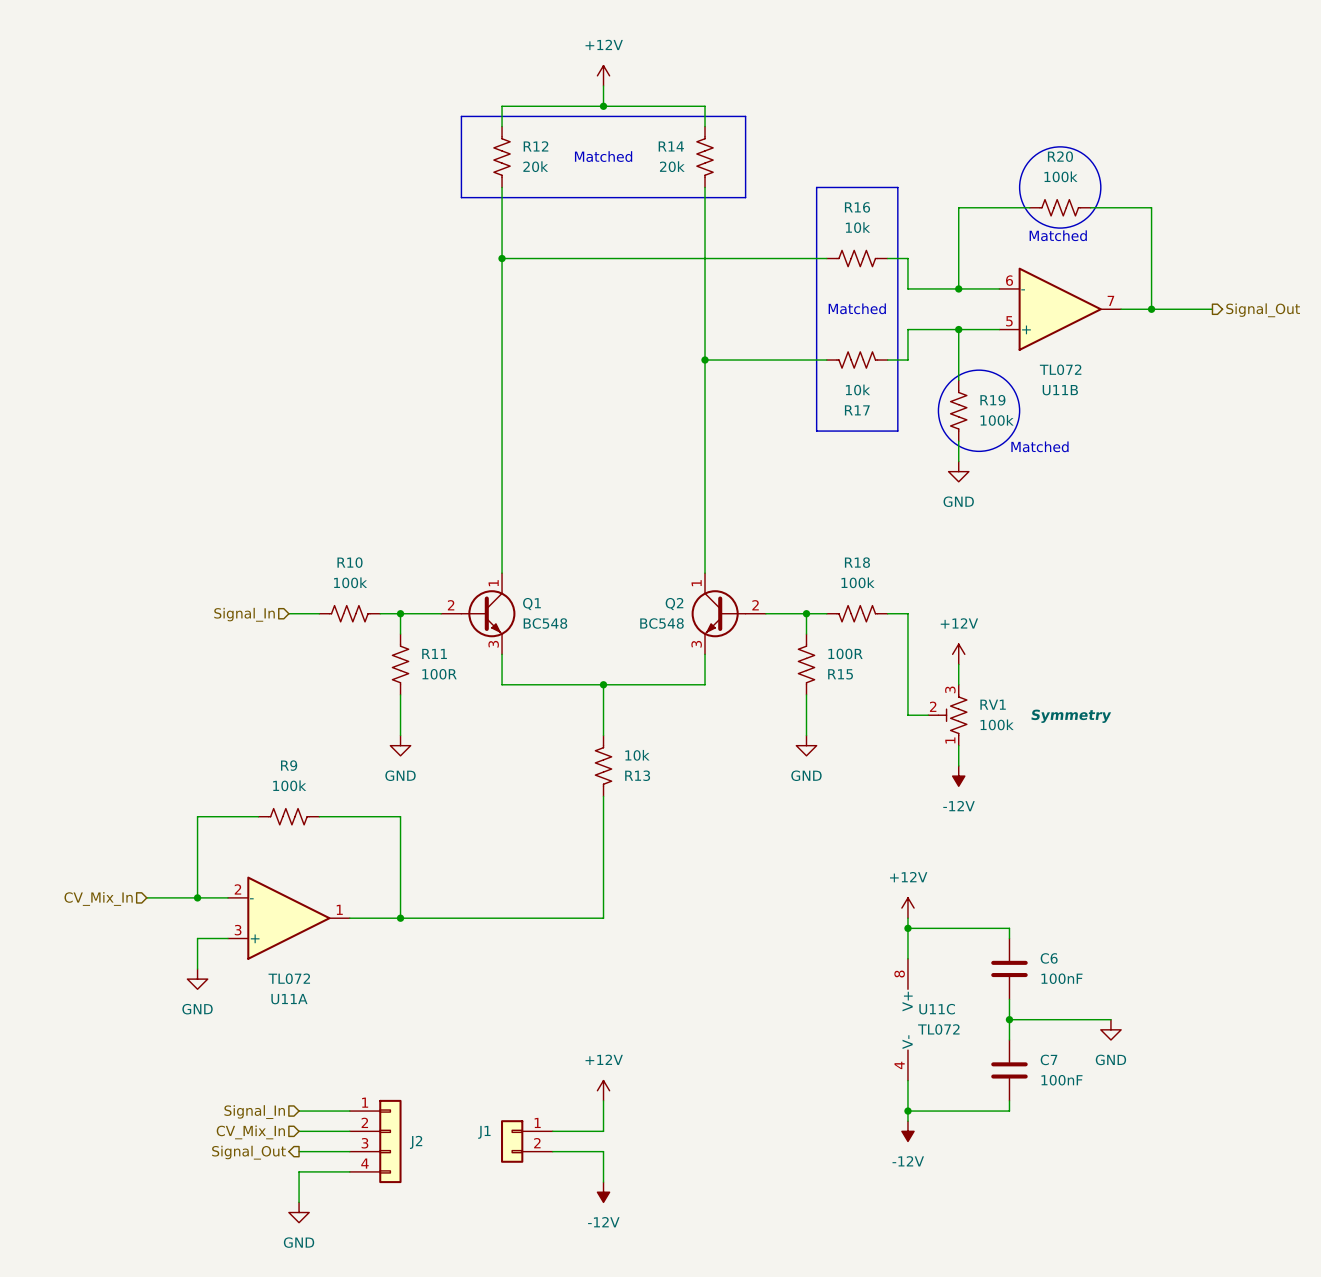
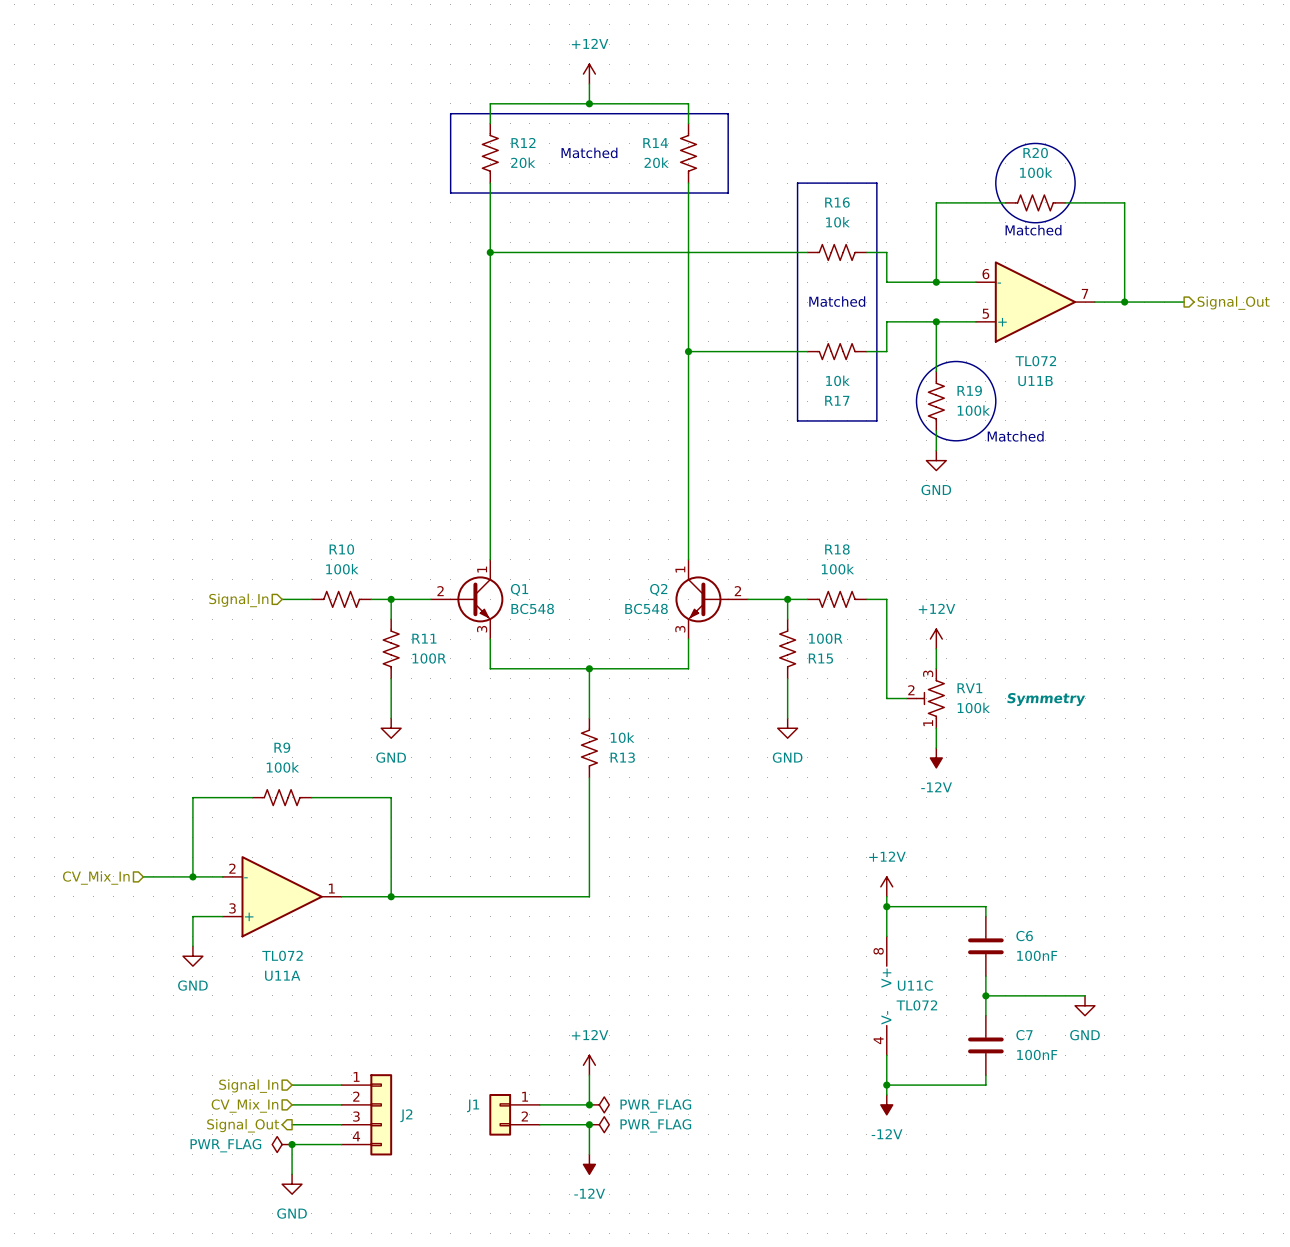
junction: none -> (589, 1104)
power symbol: none -> PWR_FLAG (599, 1104)
junction: none -> (589, 1124)
power symbol: none -> PWR_FLAG (599, 1124)
power symbol: none -> PWR_FLAG (282, 1144)
junction: none -> (292, 1144)

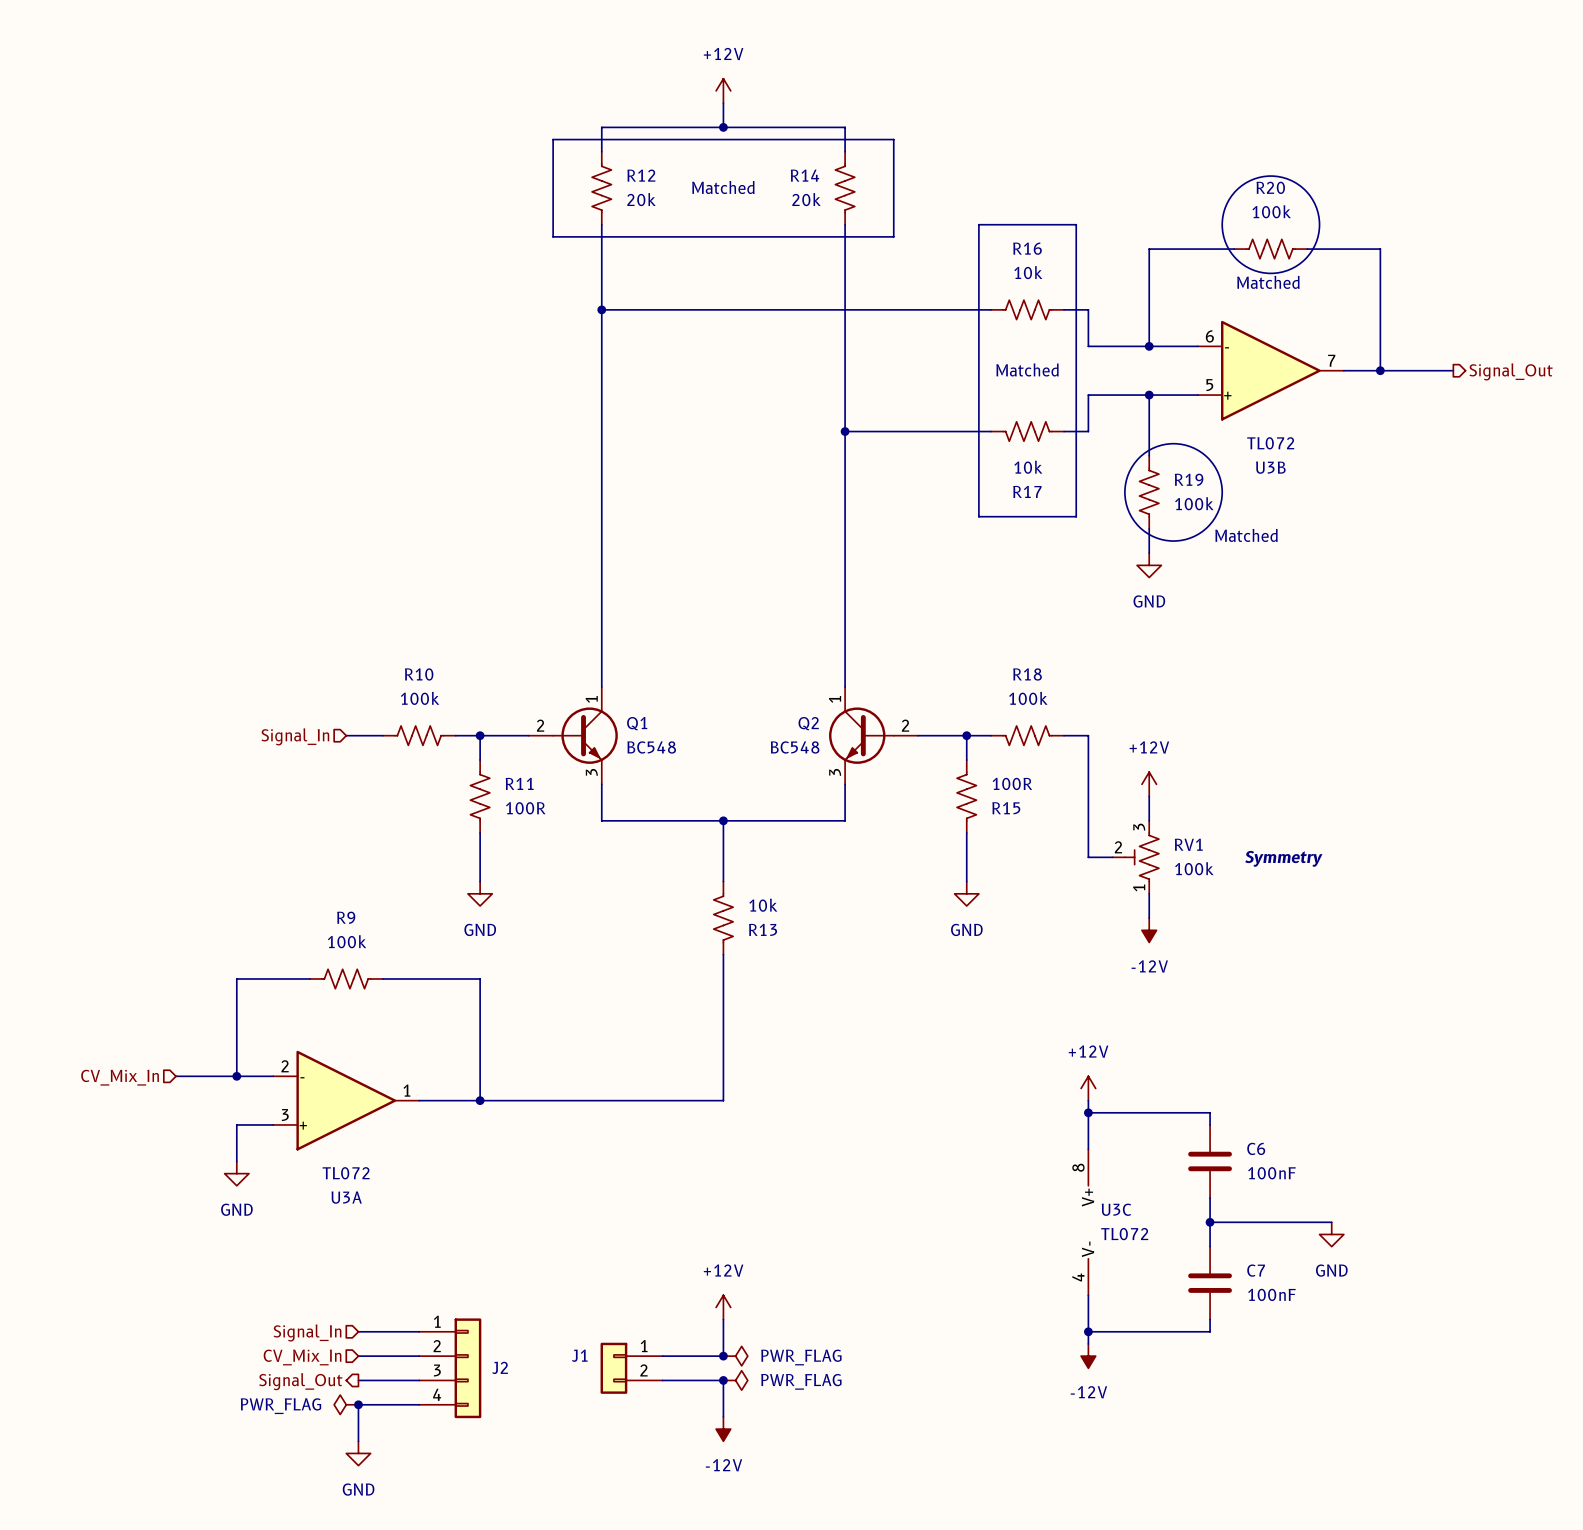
U11B name: U11B (1035, 381) -> U3B (1270, 467)
U11A name: U11A (282, 975) -> U3A (346, 1197)
U11C name: U11C (915, 985) -> U3C (1116, 1209)

